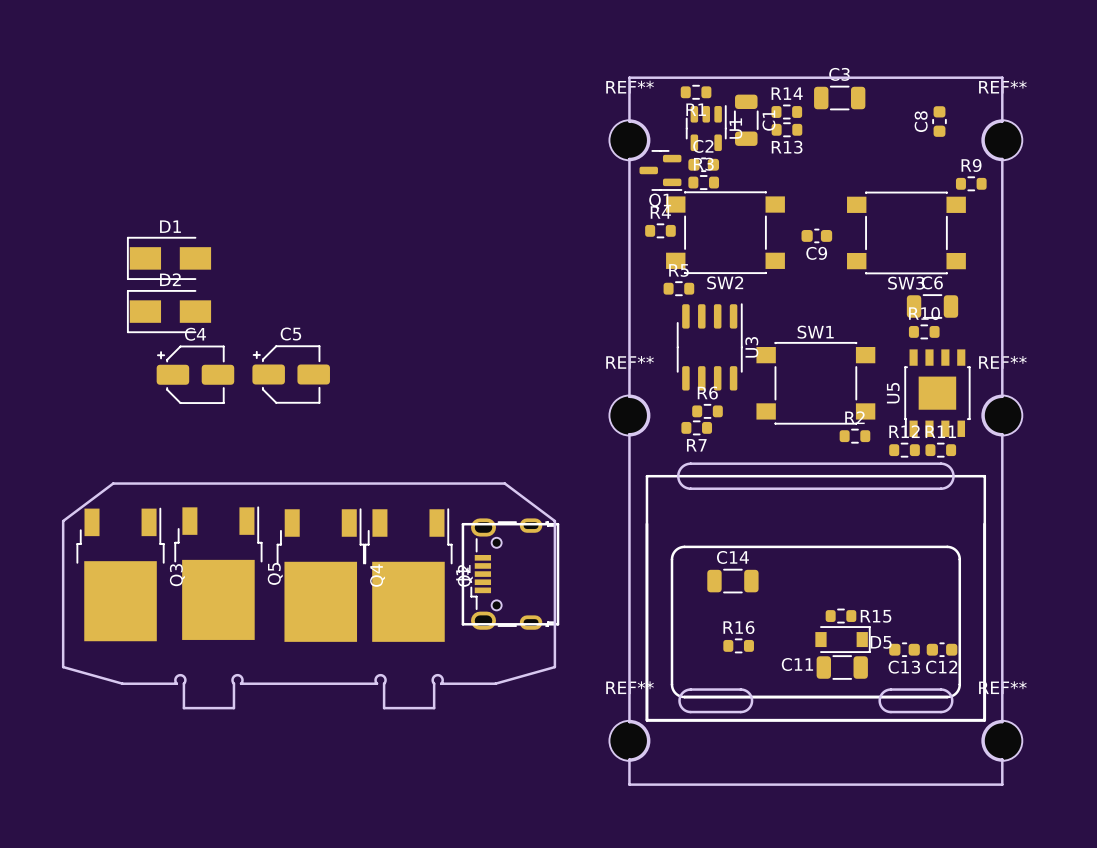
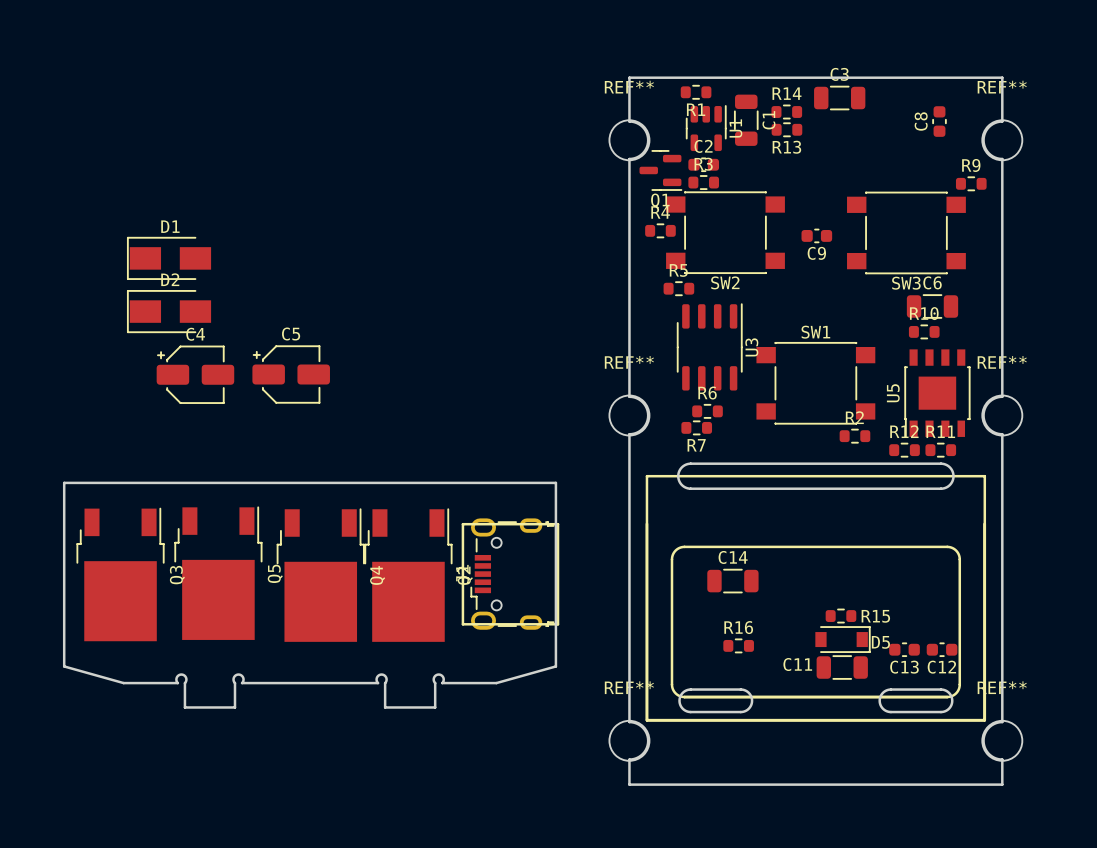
board edge: (113, 483) (504, 483) (554, 521) (554, 667) (495, 683) (441, 683) (441, 677) (435, 675) (432, 679) (434, 708) (384, 708) (385, 679) (381, 675) (376, 677) (377, 683) (241, 683) (242, 678) (237, 675) (232, 679) (233, 708) (183, 708) (185, 679) (182, 675) (176, 677) (176, 683) (122, 683) (63, 667) (63, 521) (113, 483) -> (64, 482) (64, 666) (123, 683) (177, 683) (177, 676) (183, 674) (186, 679) (184, 707) (234, 707) (233, 679) (237, 674) (243, 677) (242, 683) (378, 683) (377, 677) (381, 674) (386, 679) (385, 707) (435, 707) (433, 679) (436, 674) (442, 676) (442, 683) (496, 683) (555, 666) (555, 482) (64, 482)

